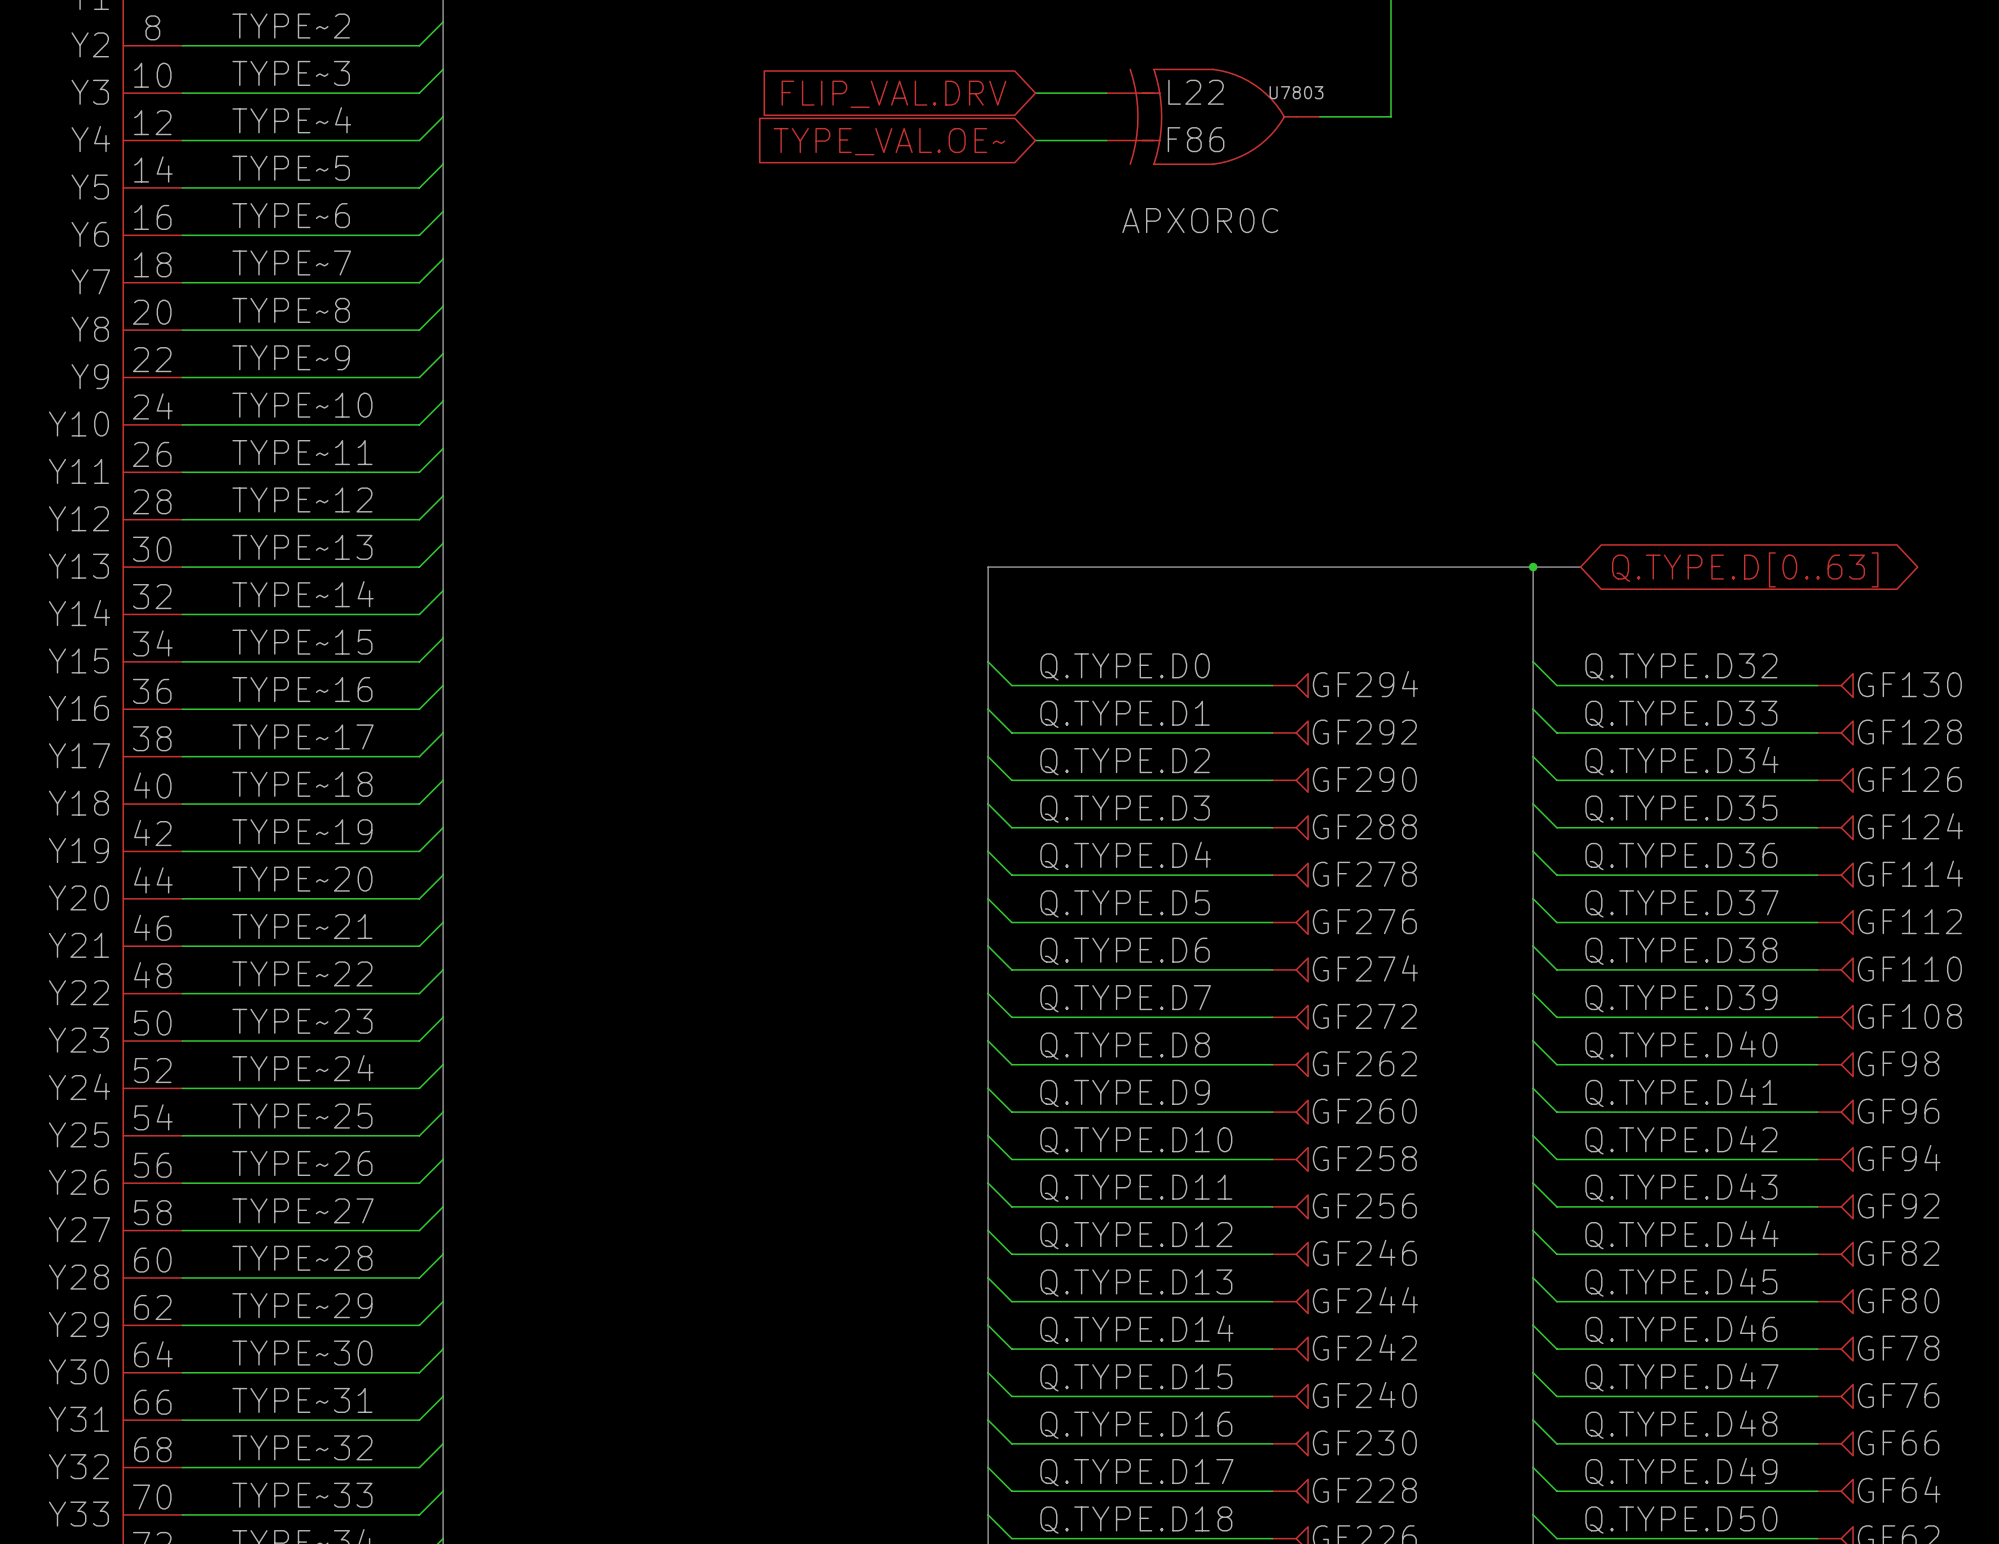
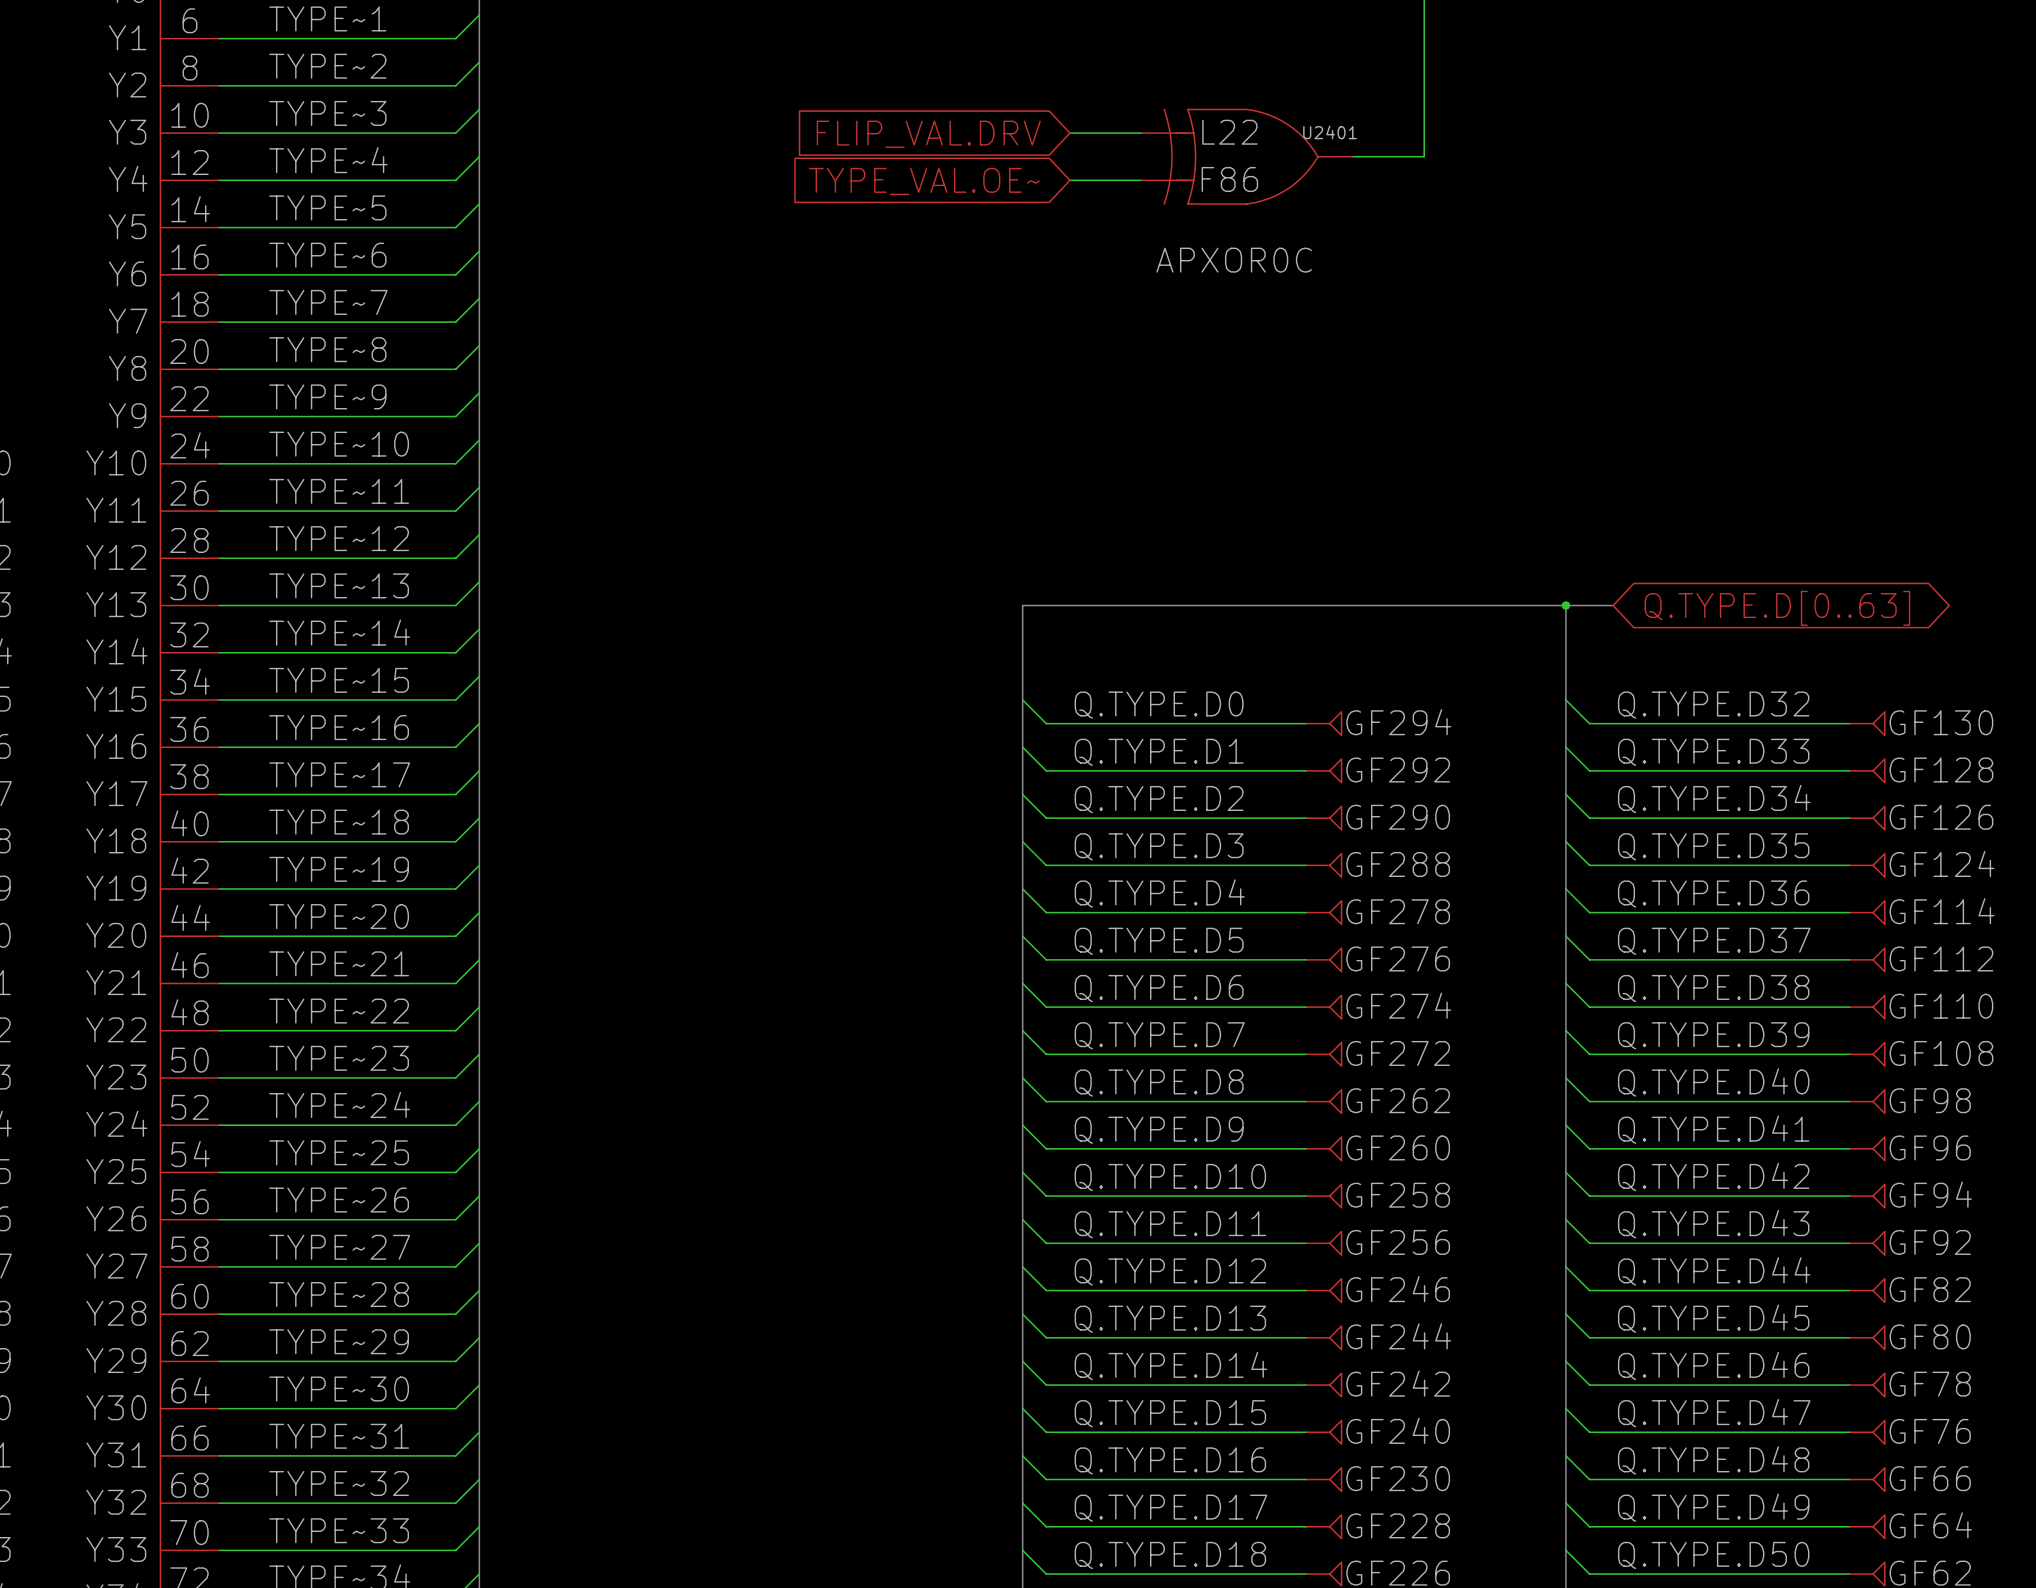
U7803 name: U7803 (1296, 92) -> U2401 (1330, 132)

